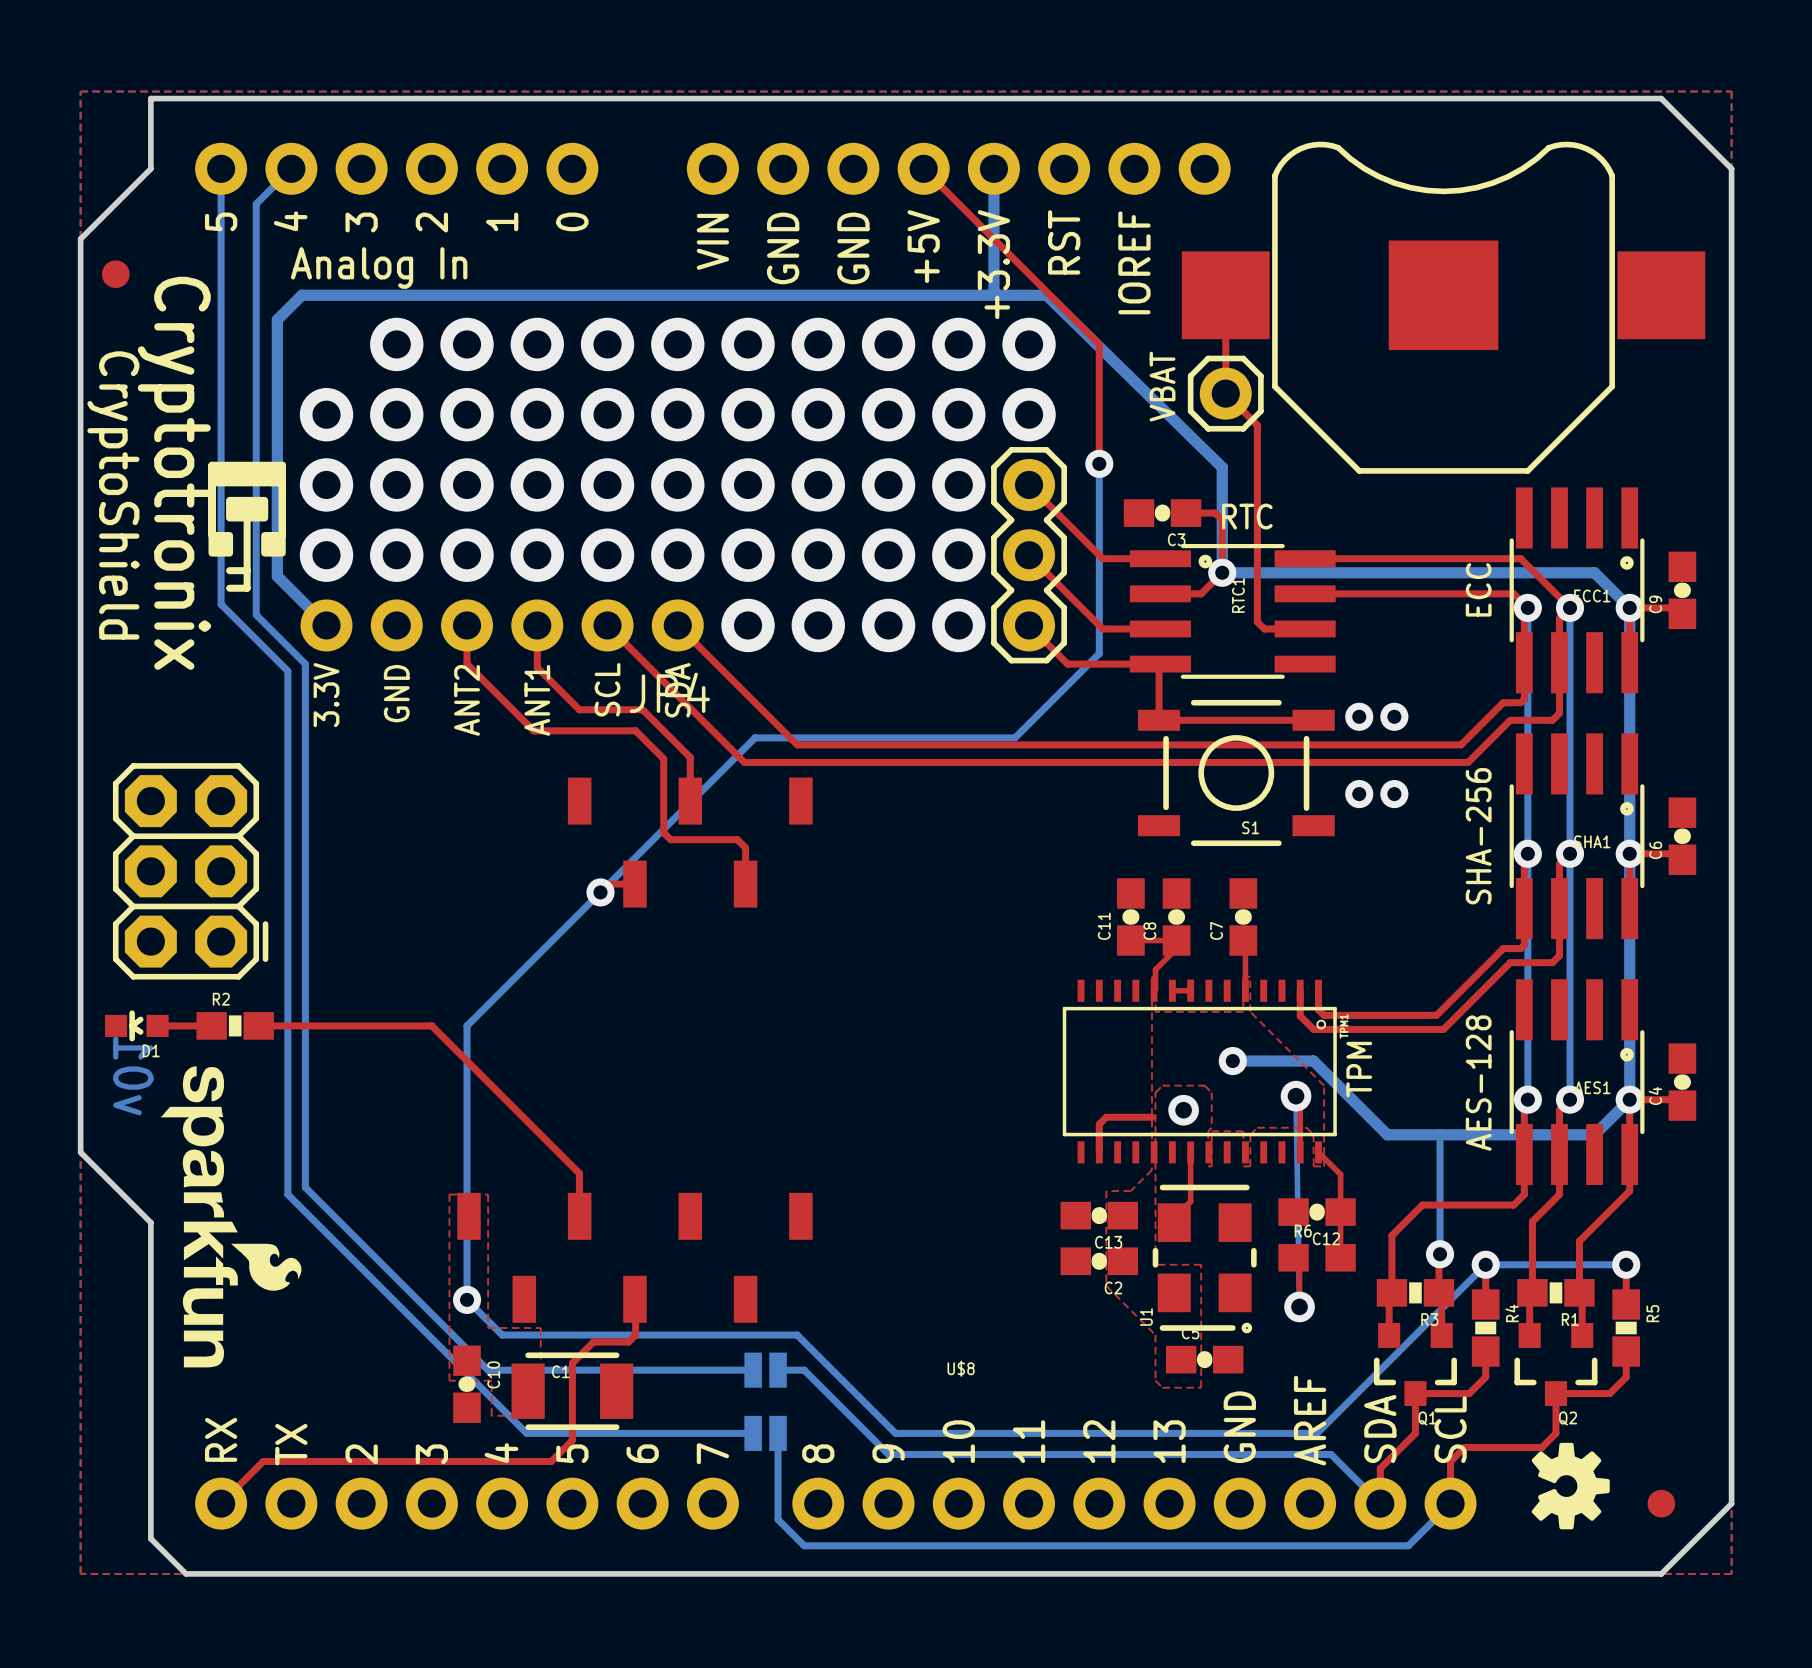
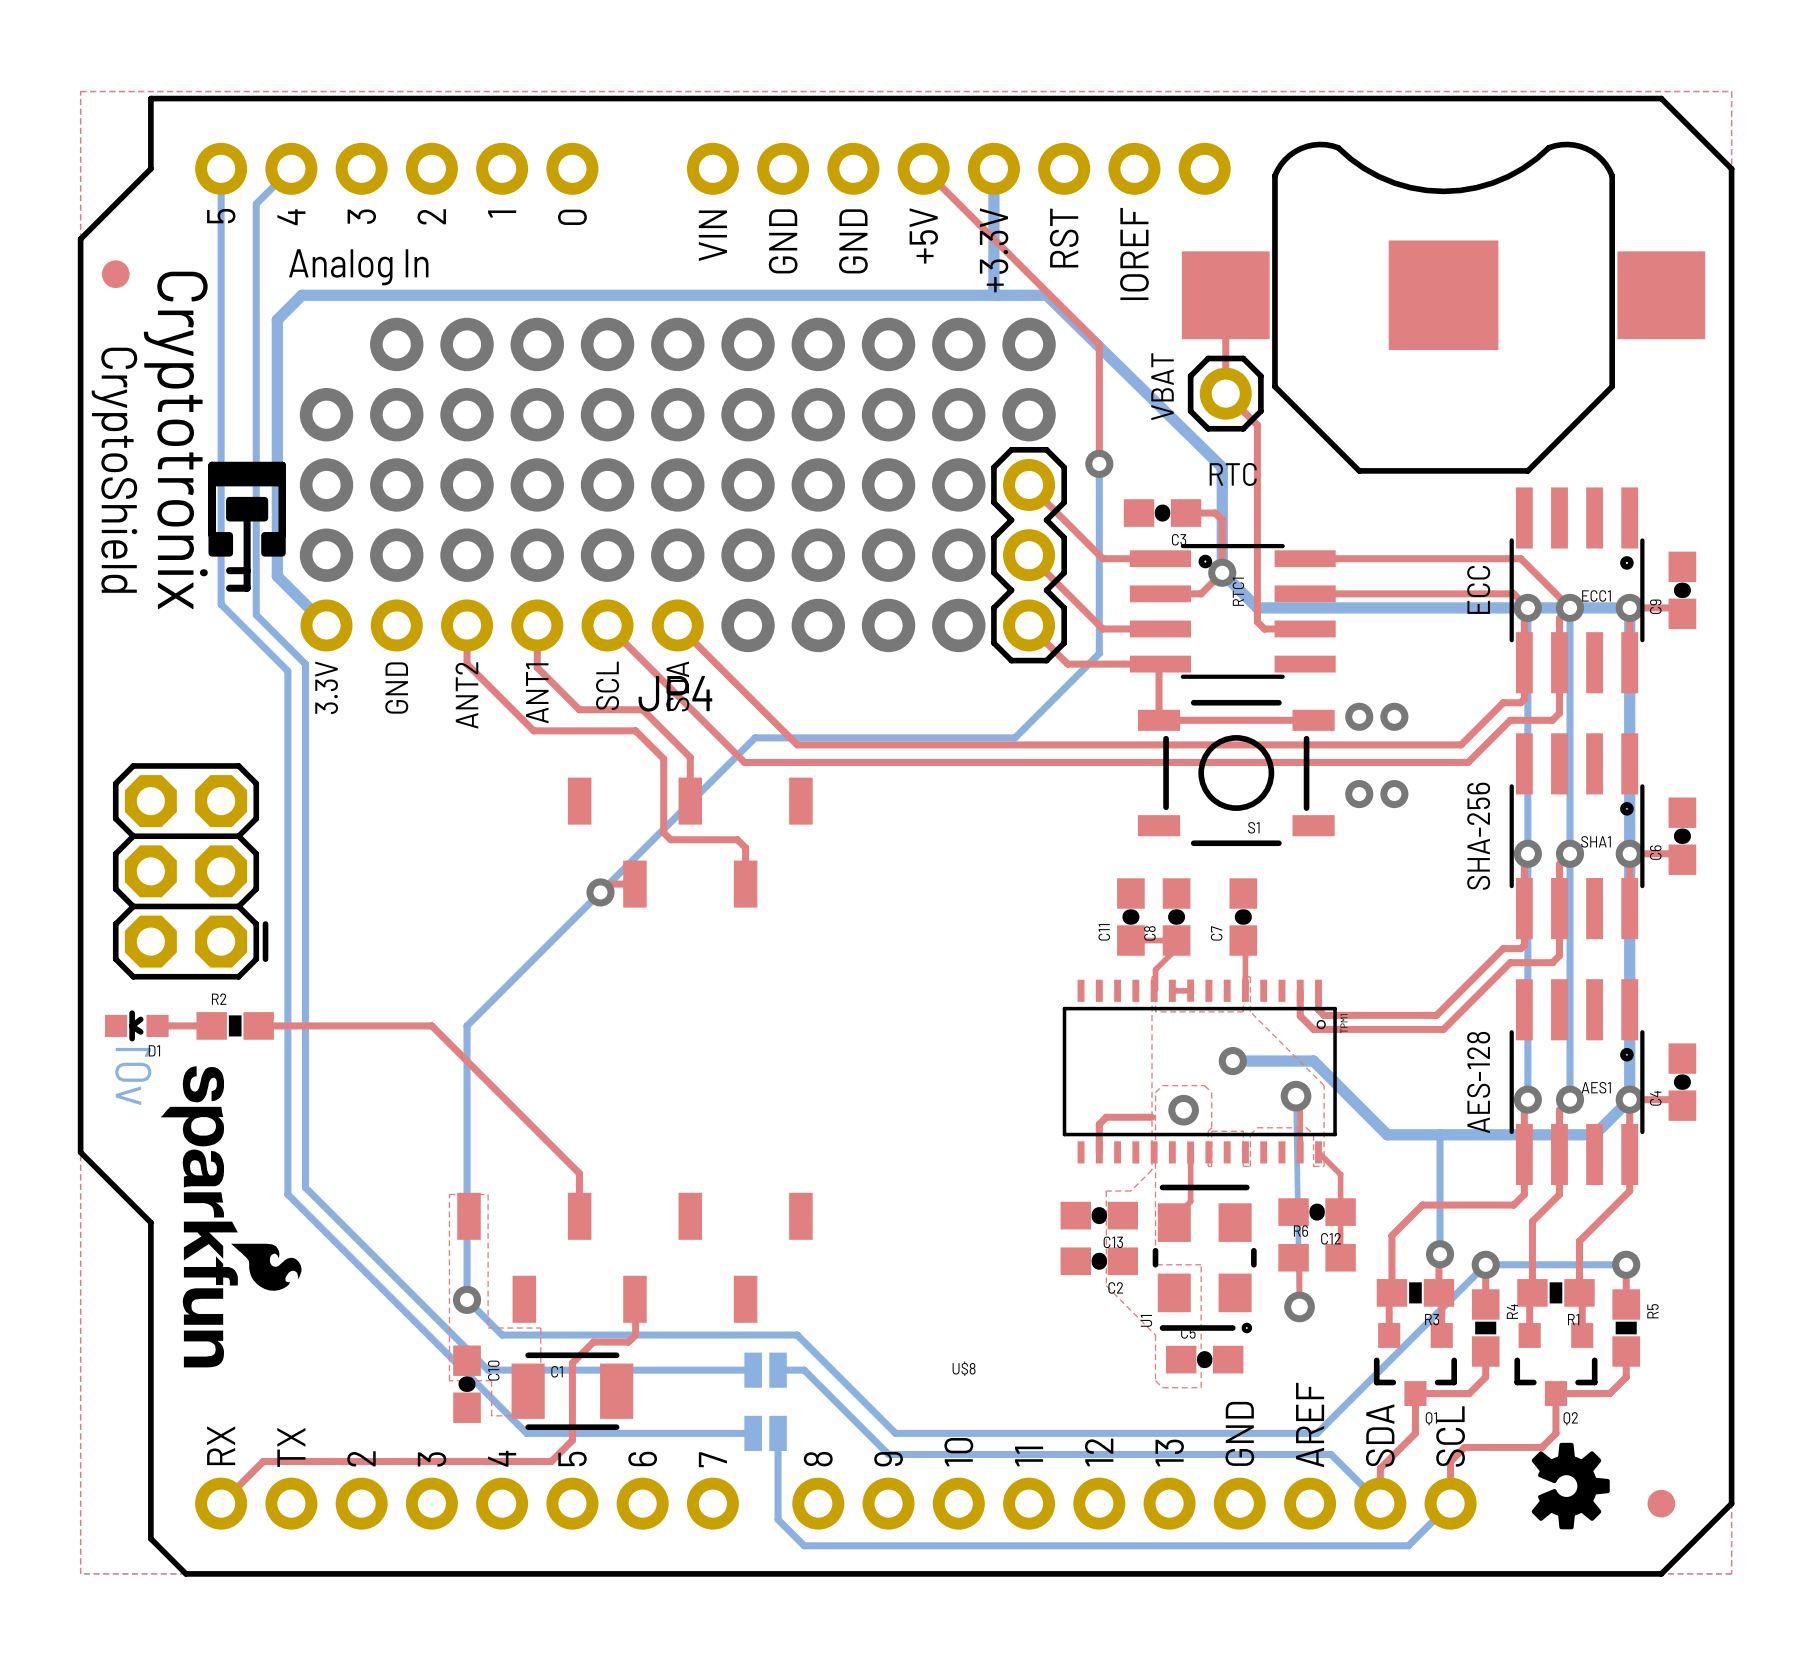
text position: RTC (1247, 516) -> RTC (1233, 474)
bottom track: (1222, 572) (1594, 572) (1629, 607) -> (1222, 572) (1257, 607) (1629, 607)
text: TPM (1359, 1069) -> none

